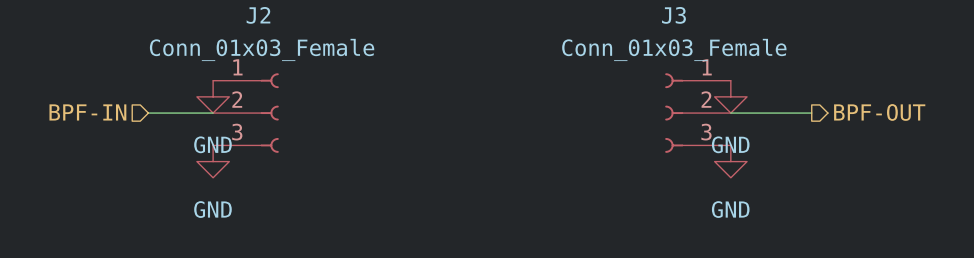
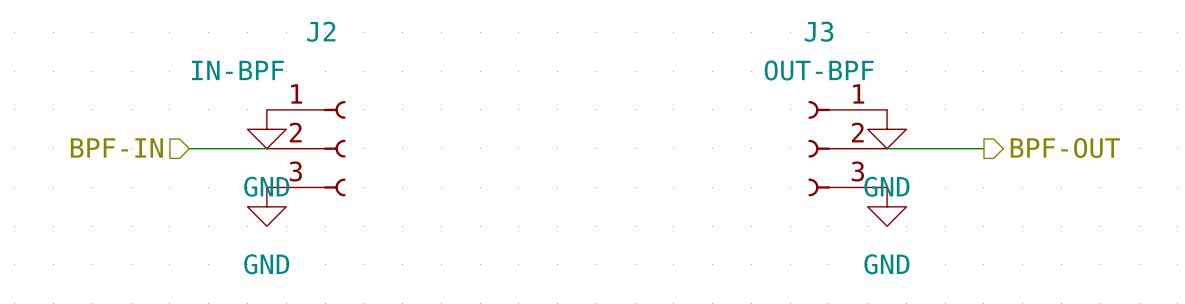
J2 value: Conn_01x03_Female (262, 49) -> IN-BPF (237, 70)
J3 value: Conn_01x03_Female (674, 49) -> OUT-BPF (819, 70)

